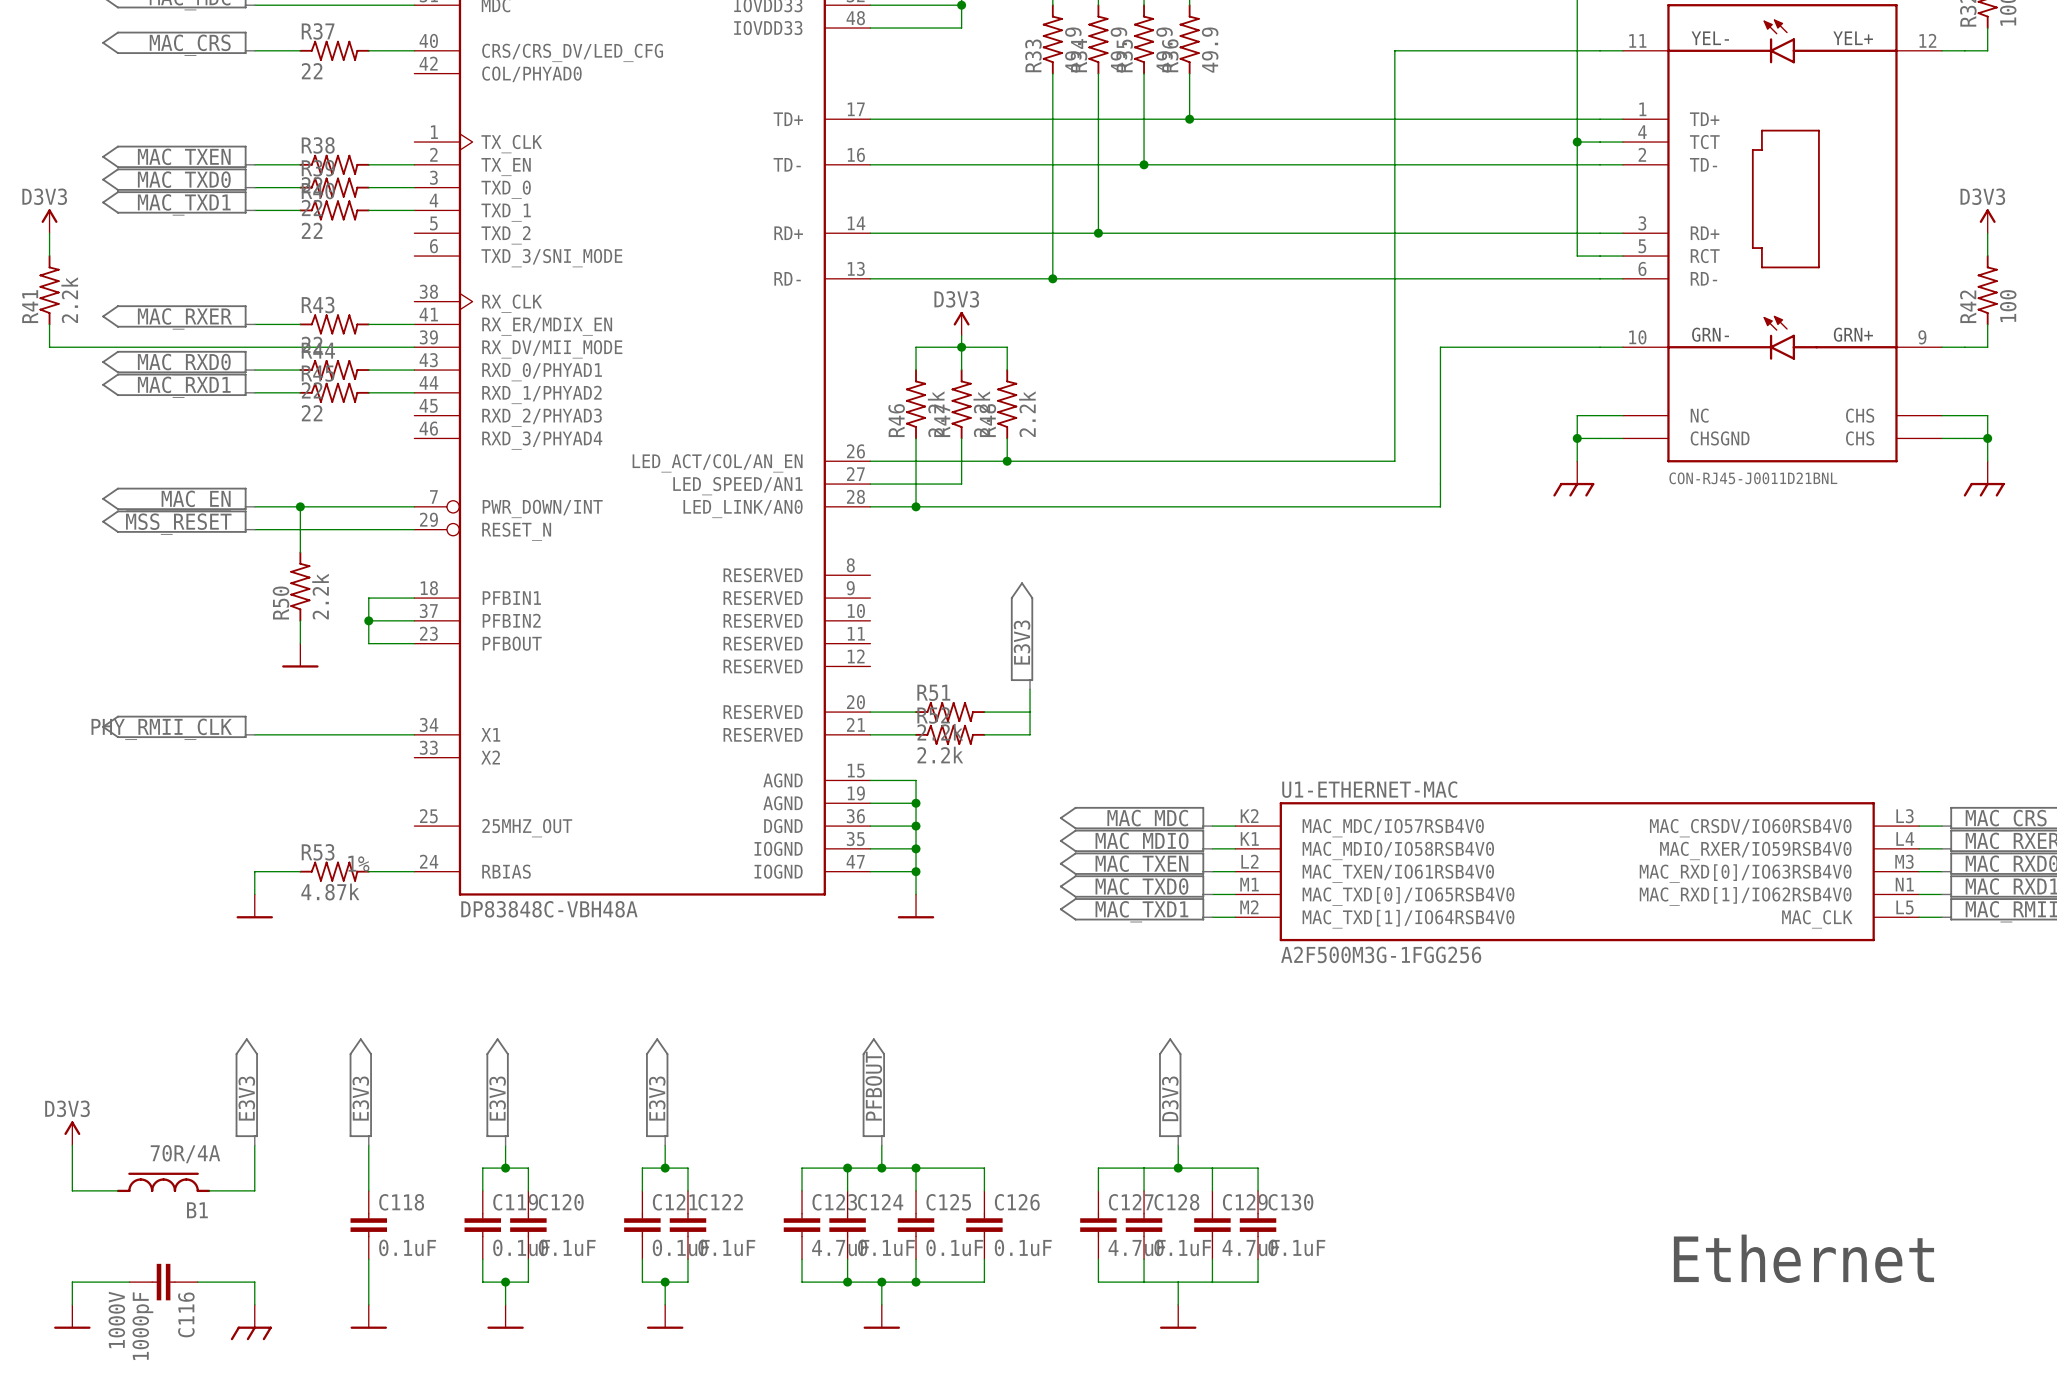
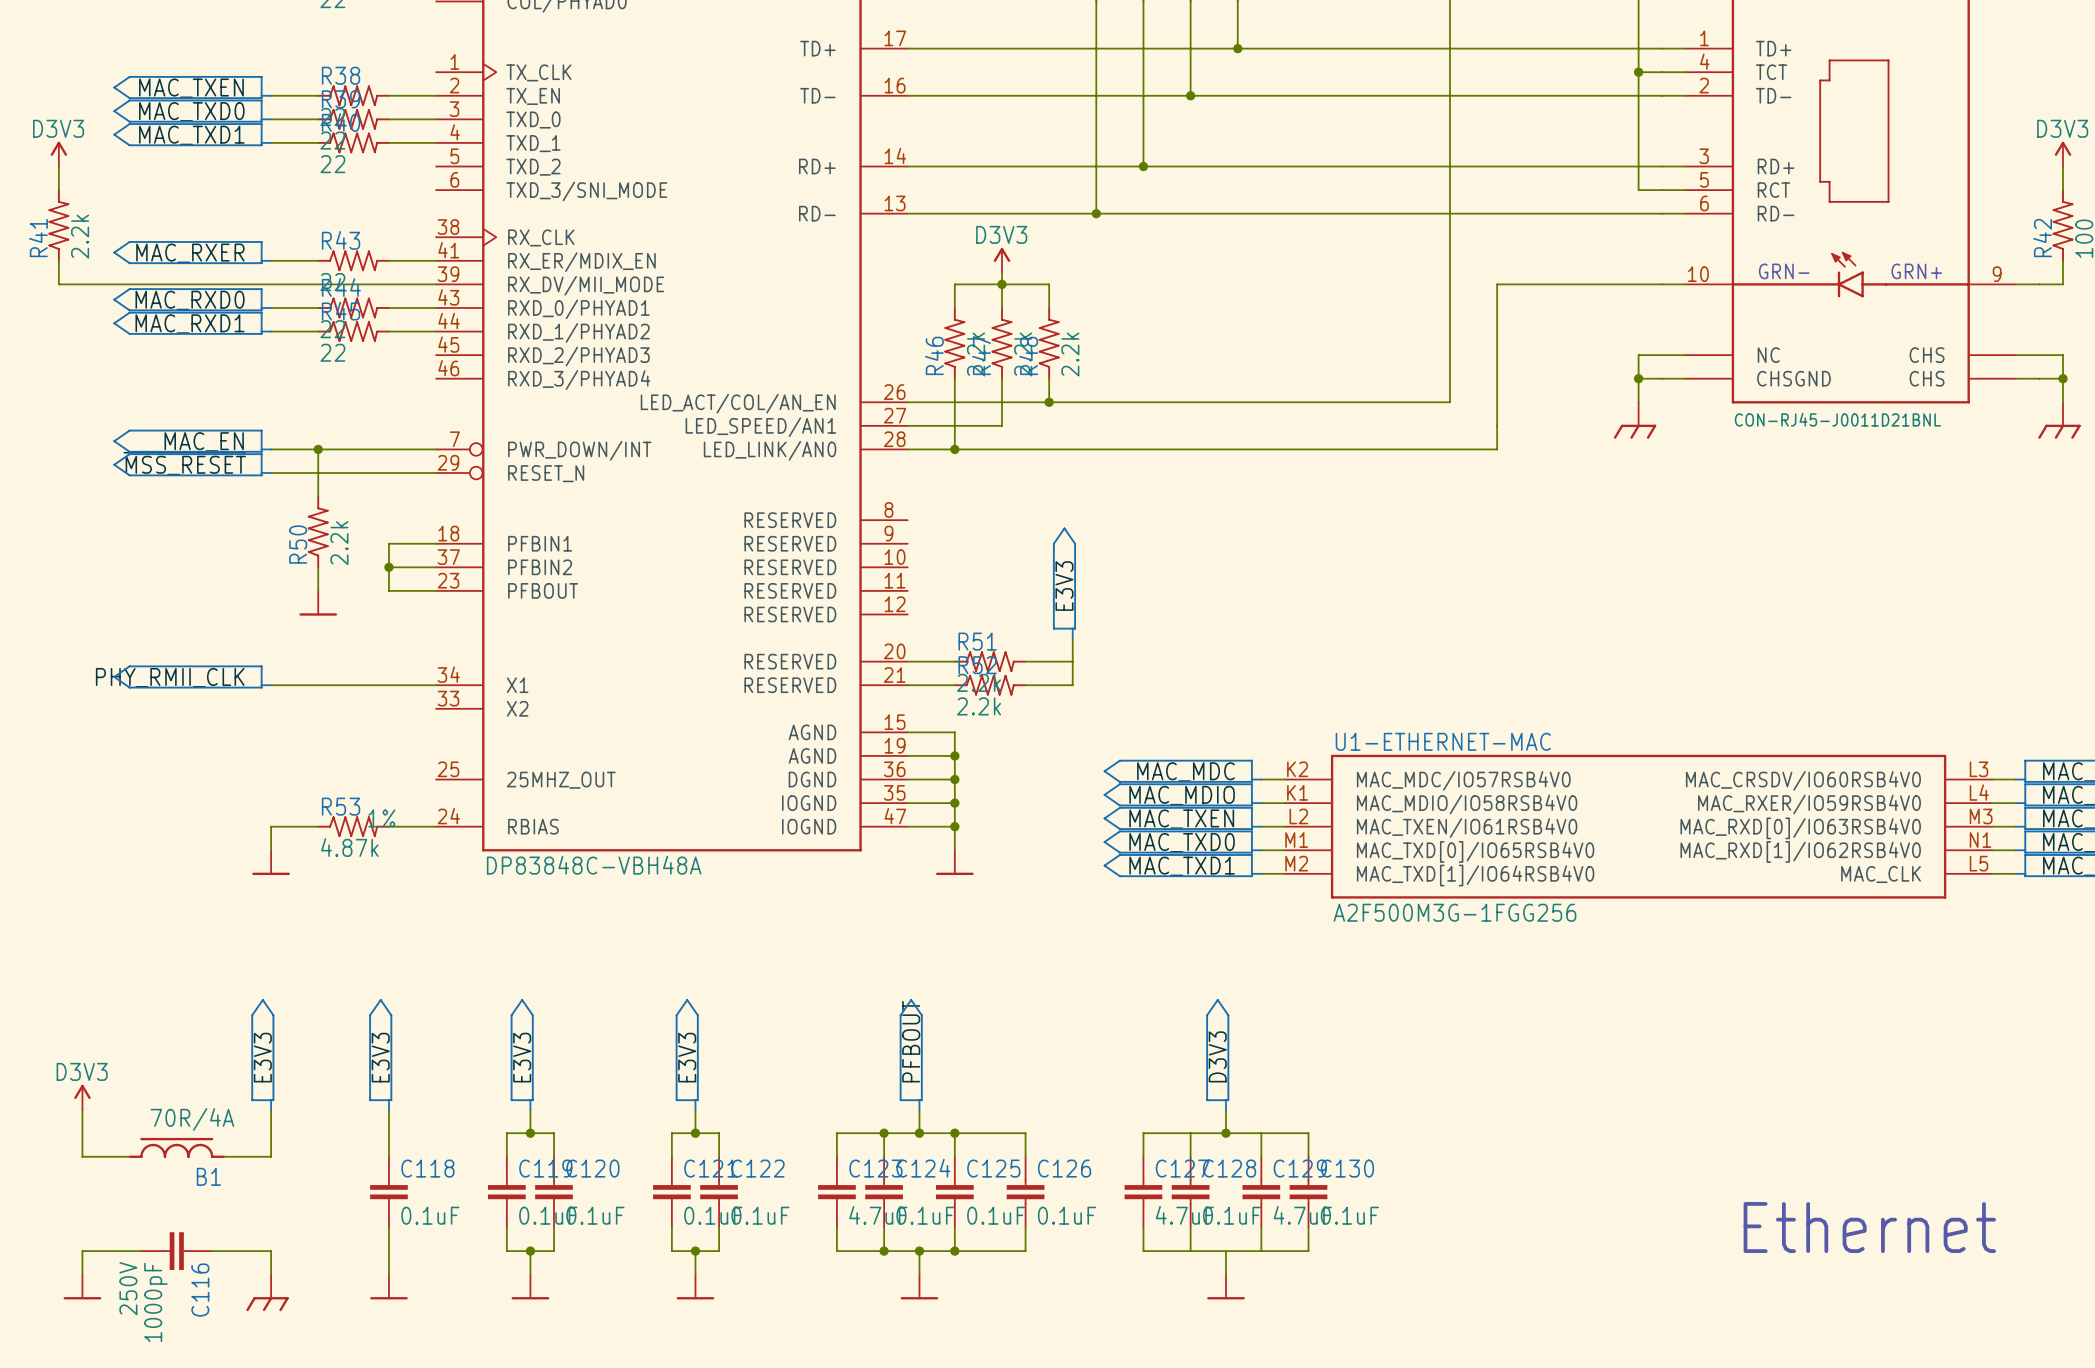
C116 text: 1000V (116, 1319) -> 250V (128, 1288)

